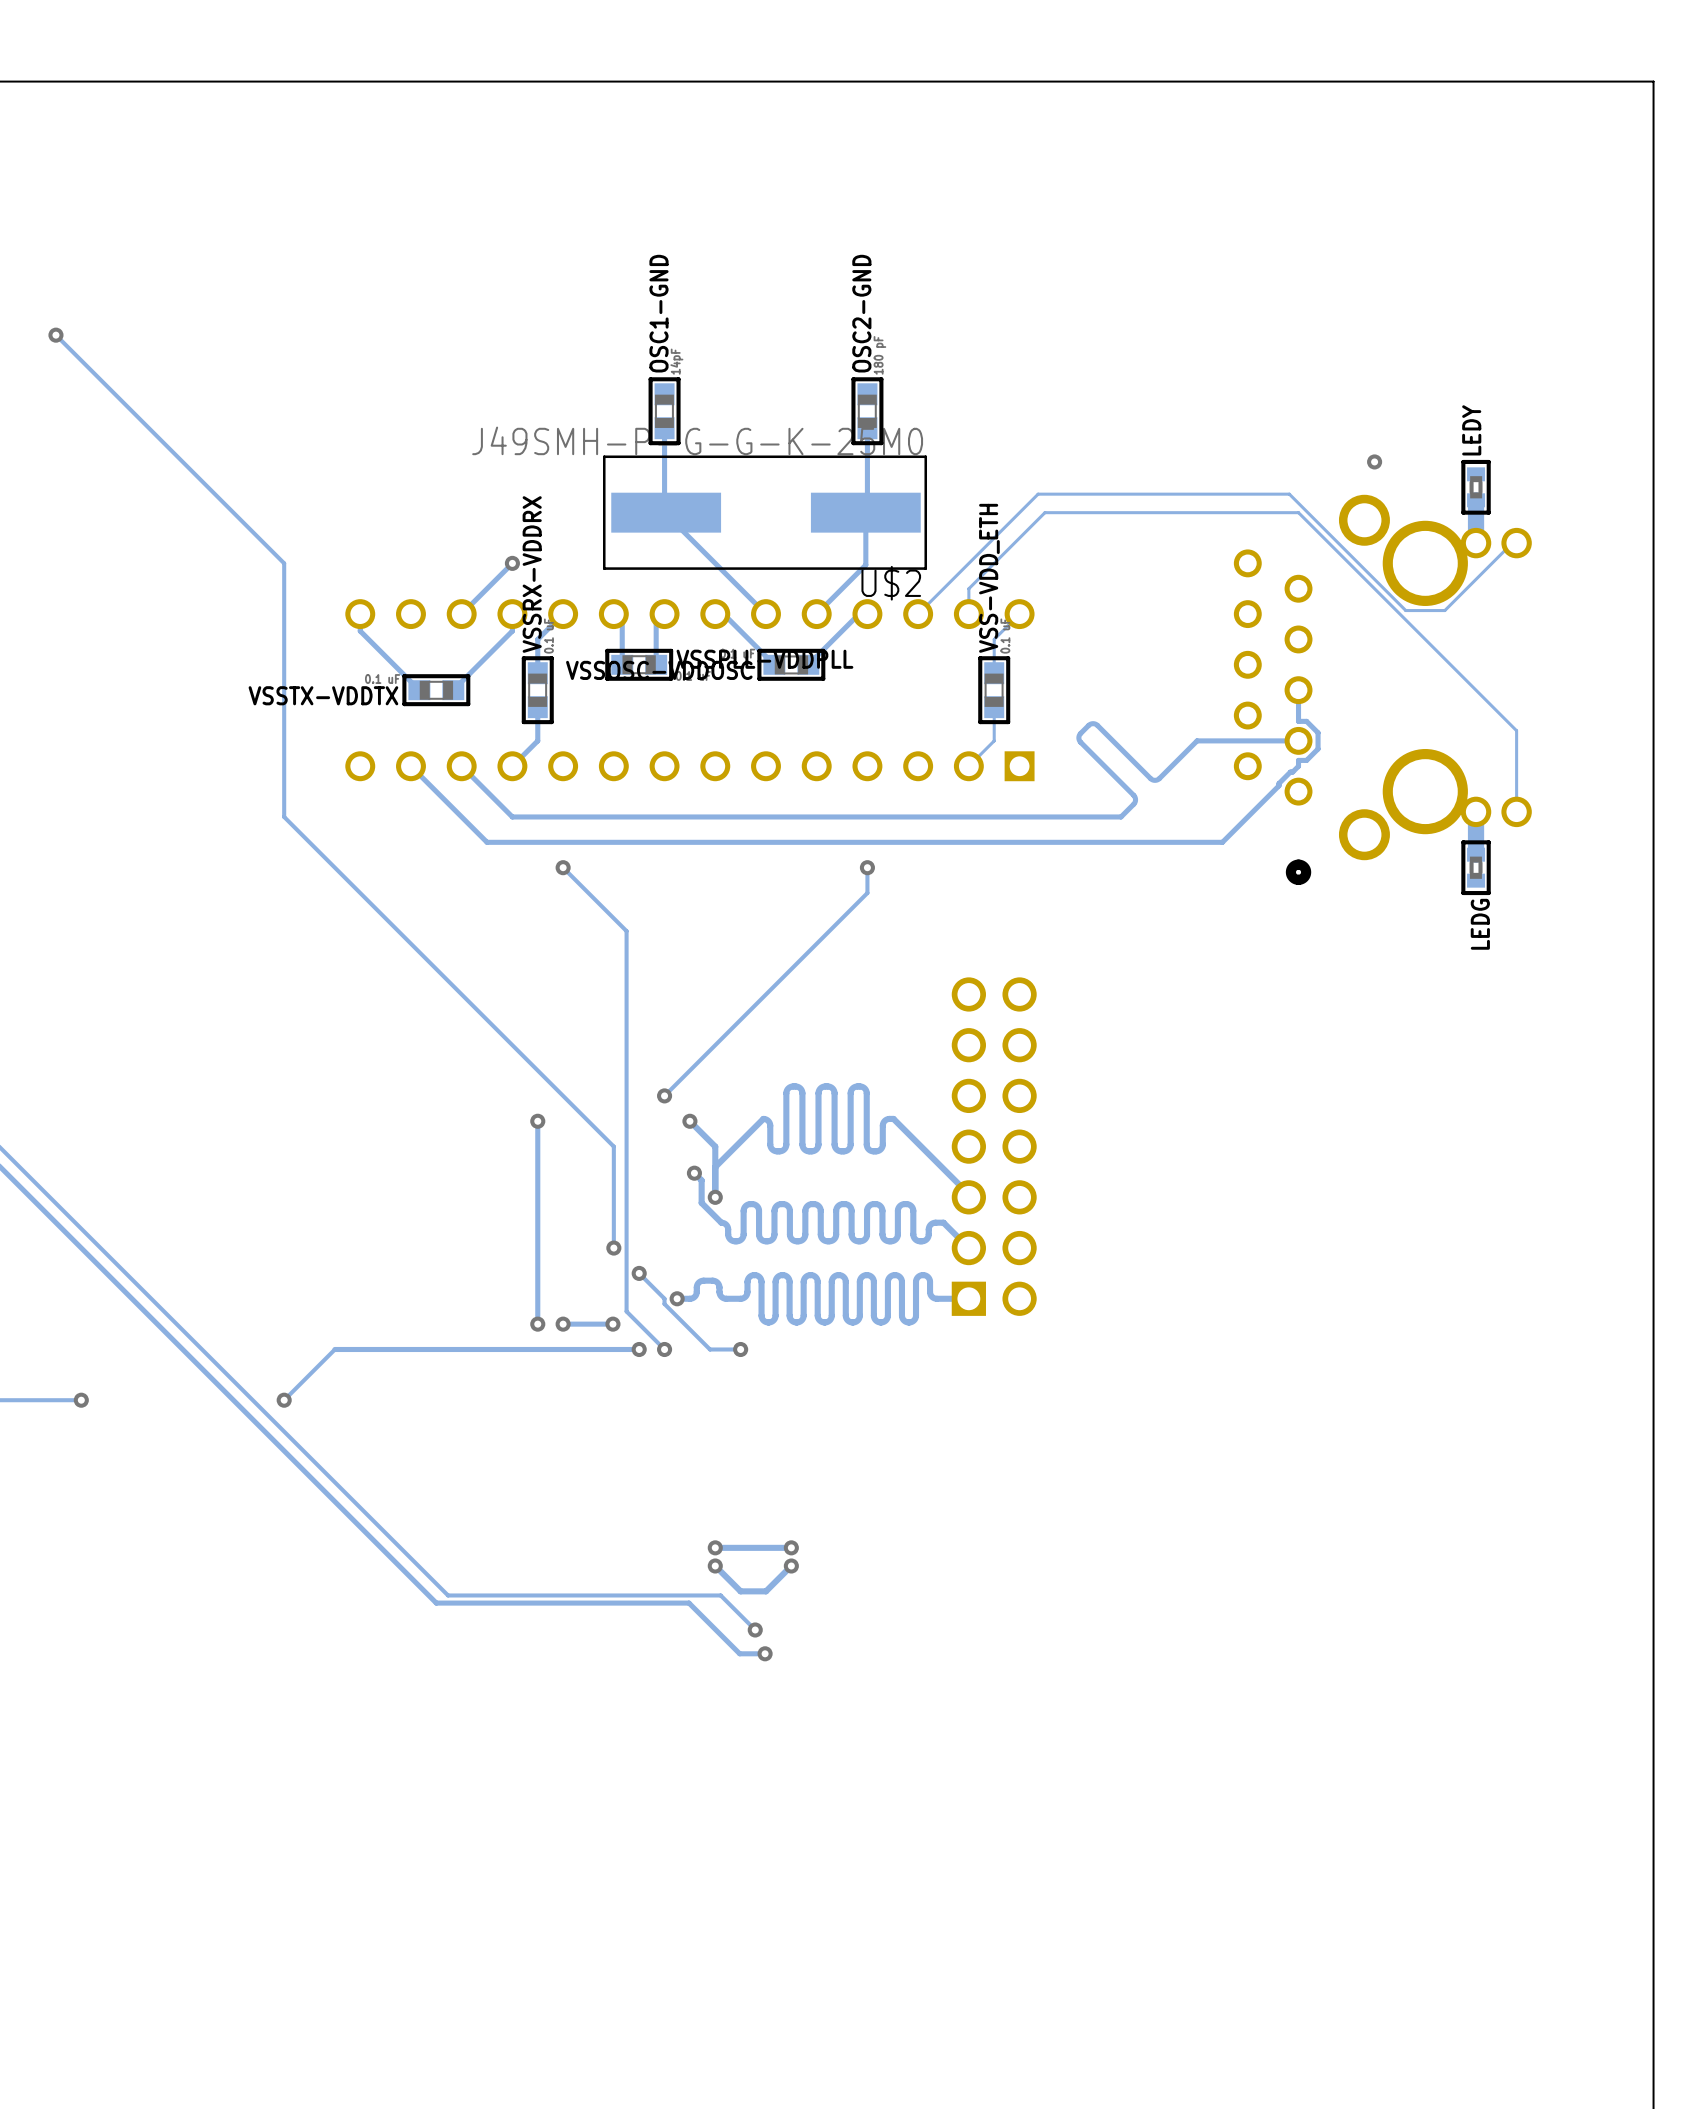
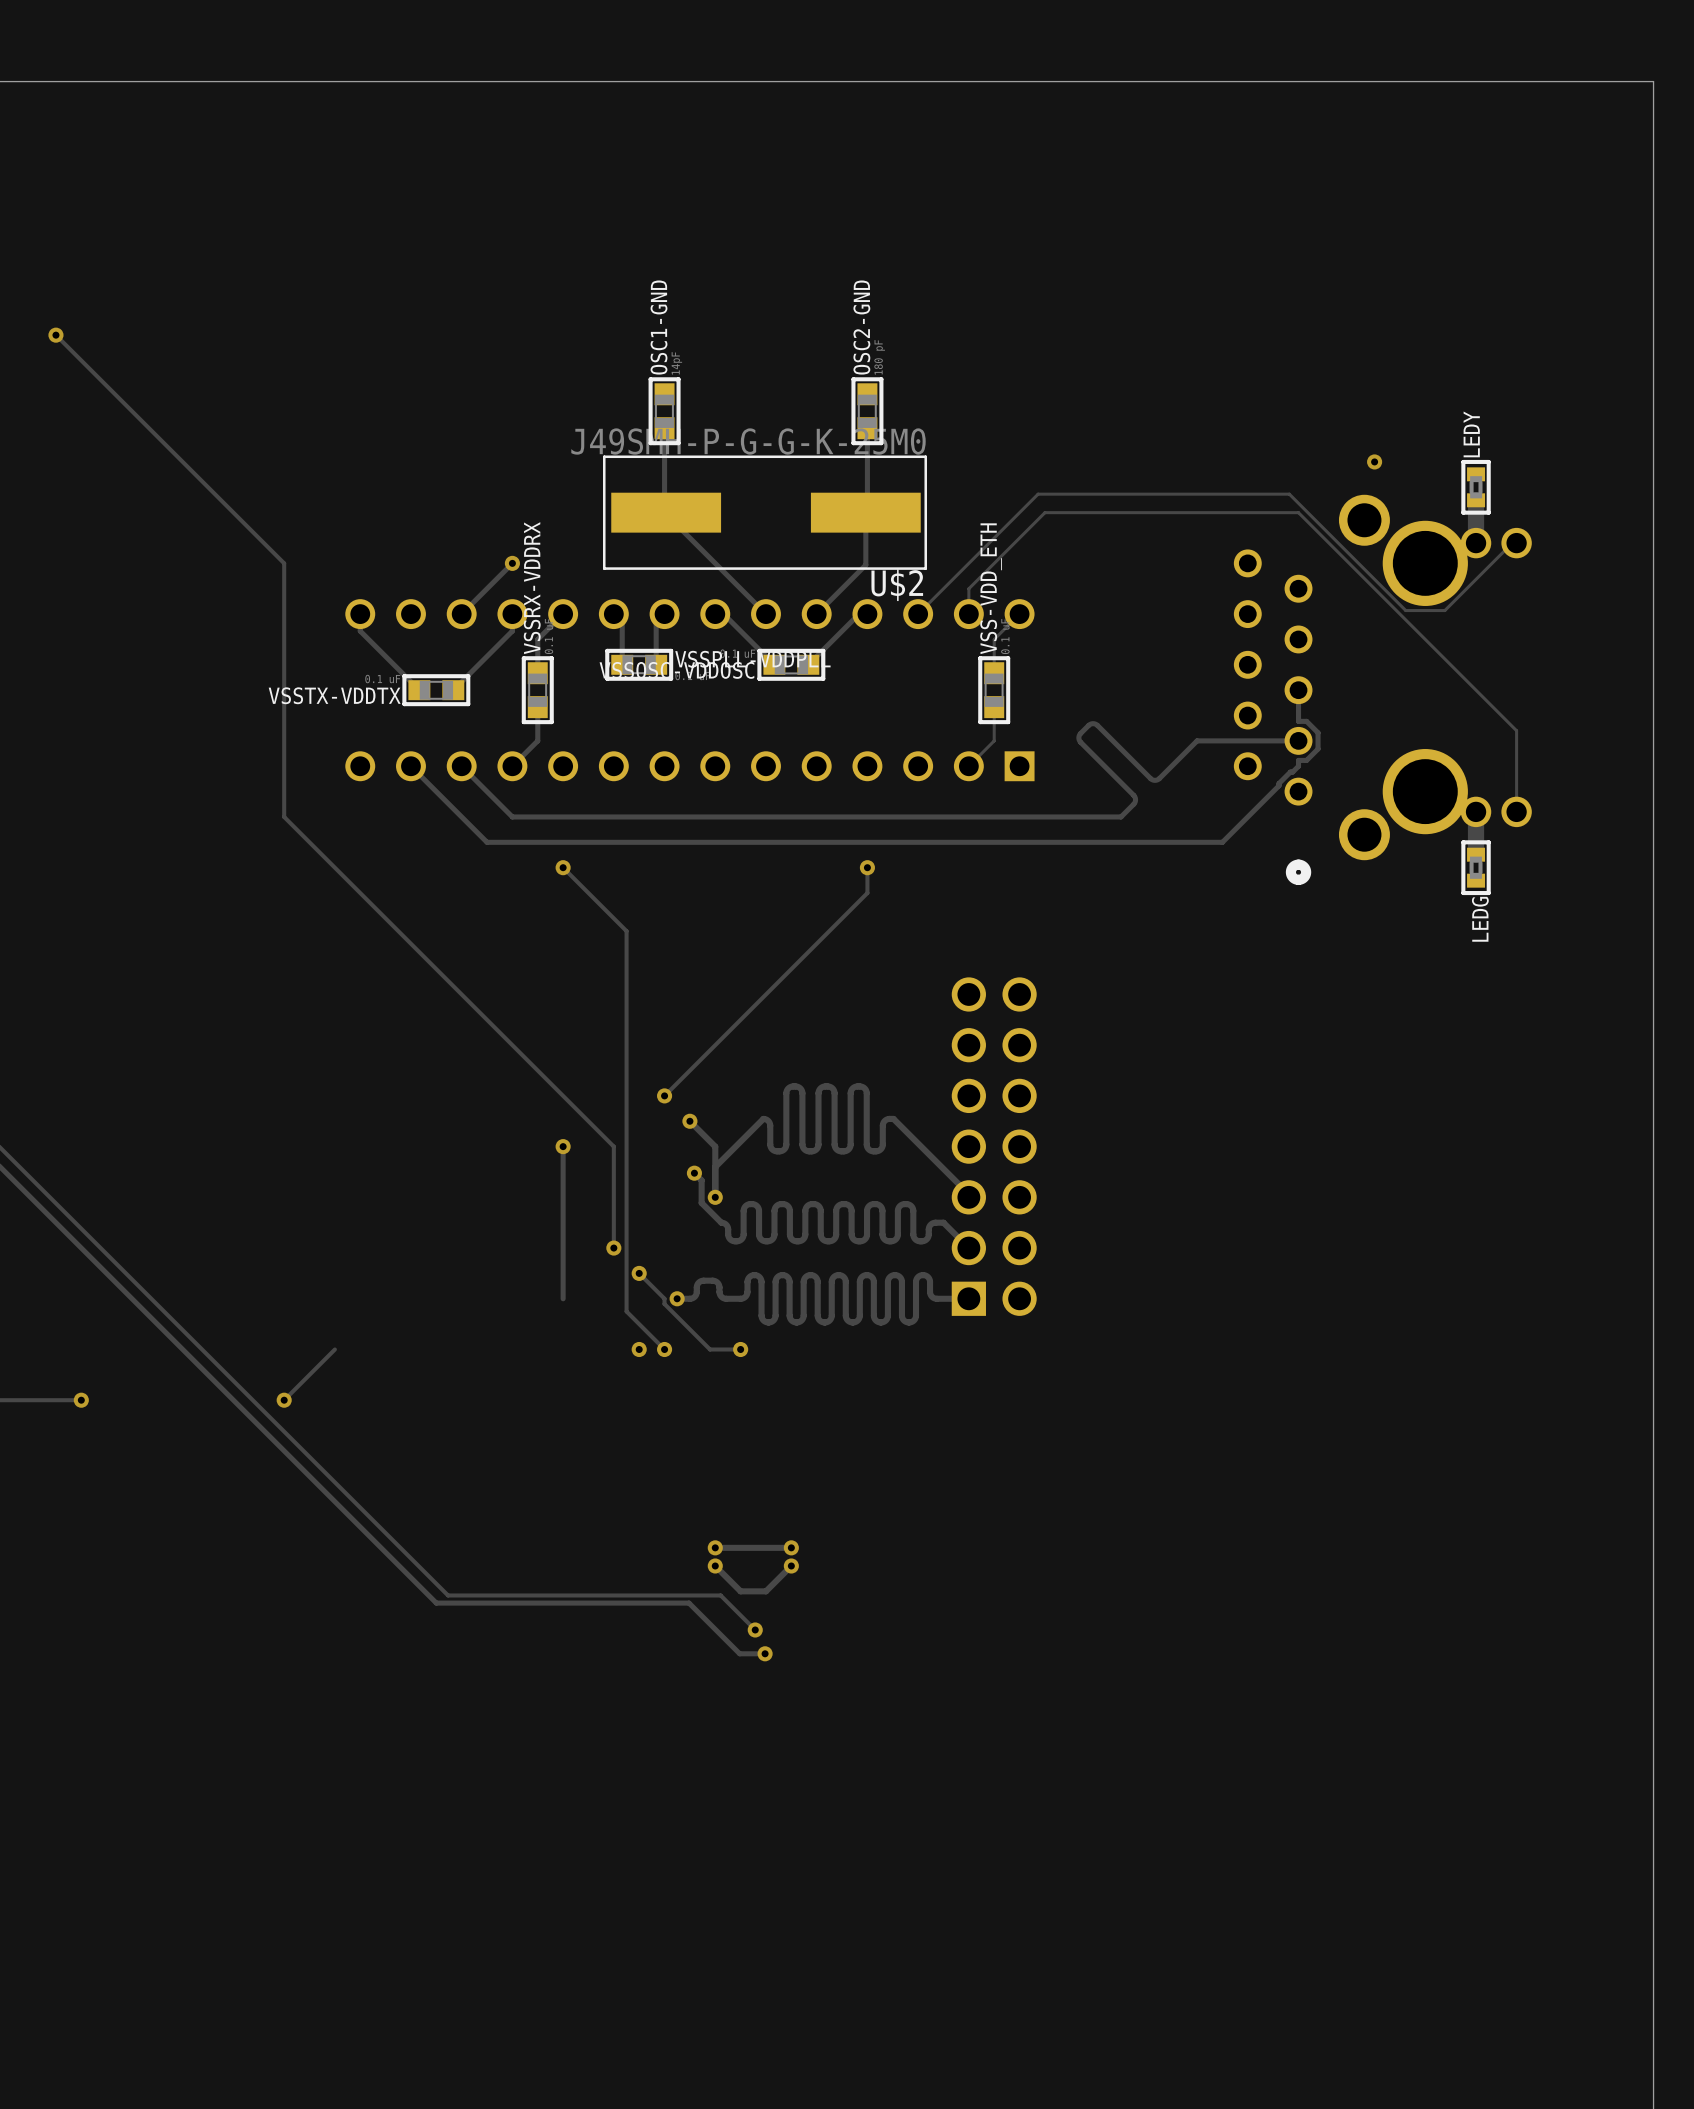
track: (537, 1121) (537, 1324) -> none
via position: (537, 1121) -> (563, 1146)
track: none -> (563, 1146) (563, 1298)
via: (537, 1324) -> none
via: (563, 1324) -> none
track: (612, 1324) (563, 1324) -> none
via: (612, 1324) -> none
track: (639, 1349) (334, 1349) -> none

